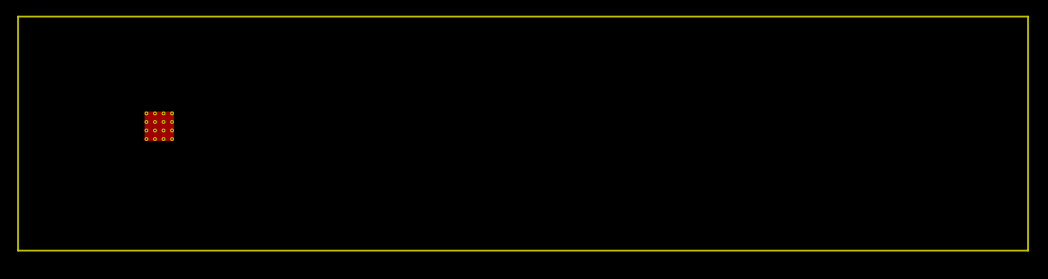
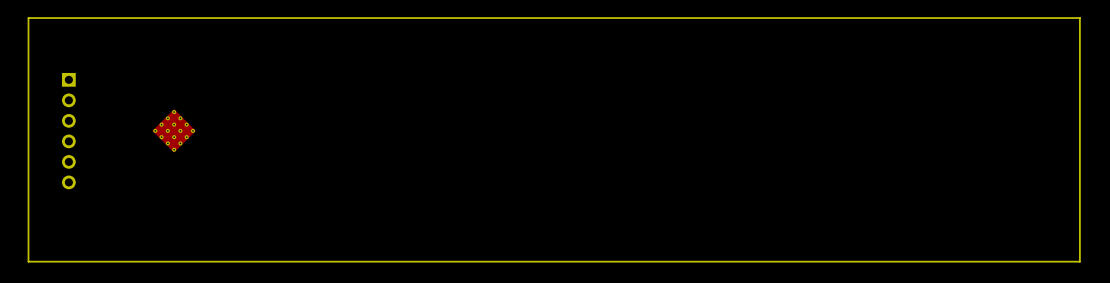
part: none -> (68, 131)
part rotation: 0° (159, 126) -> 45° clockwise (174, 130)

